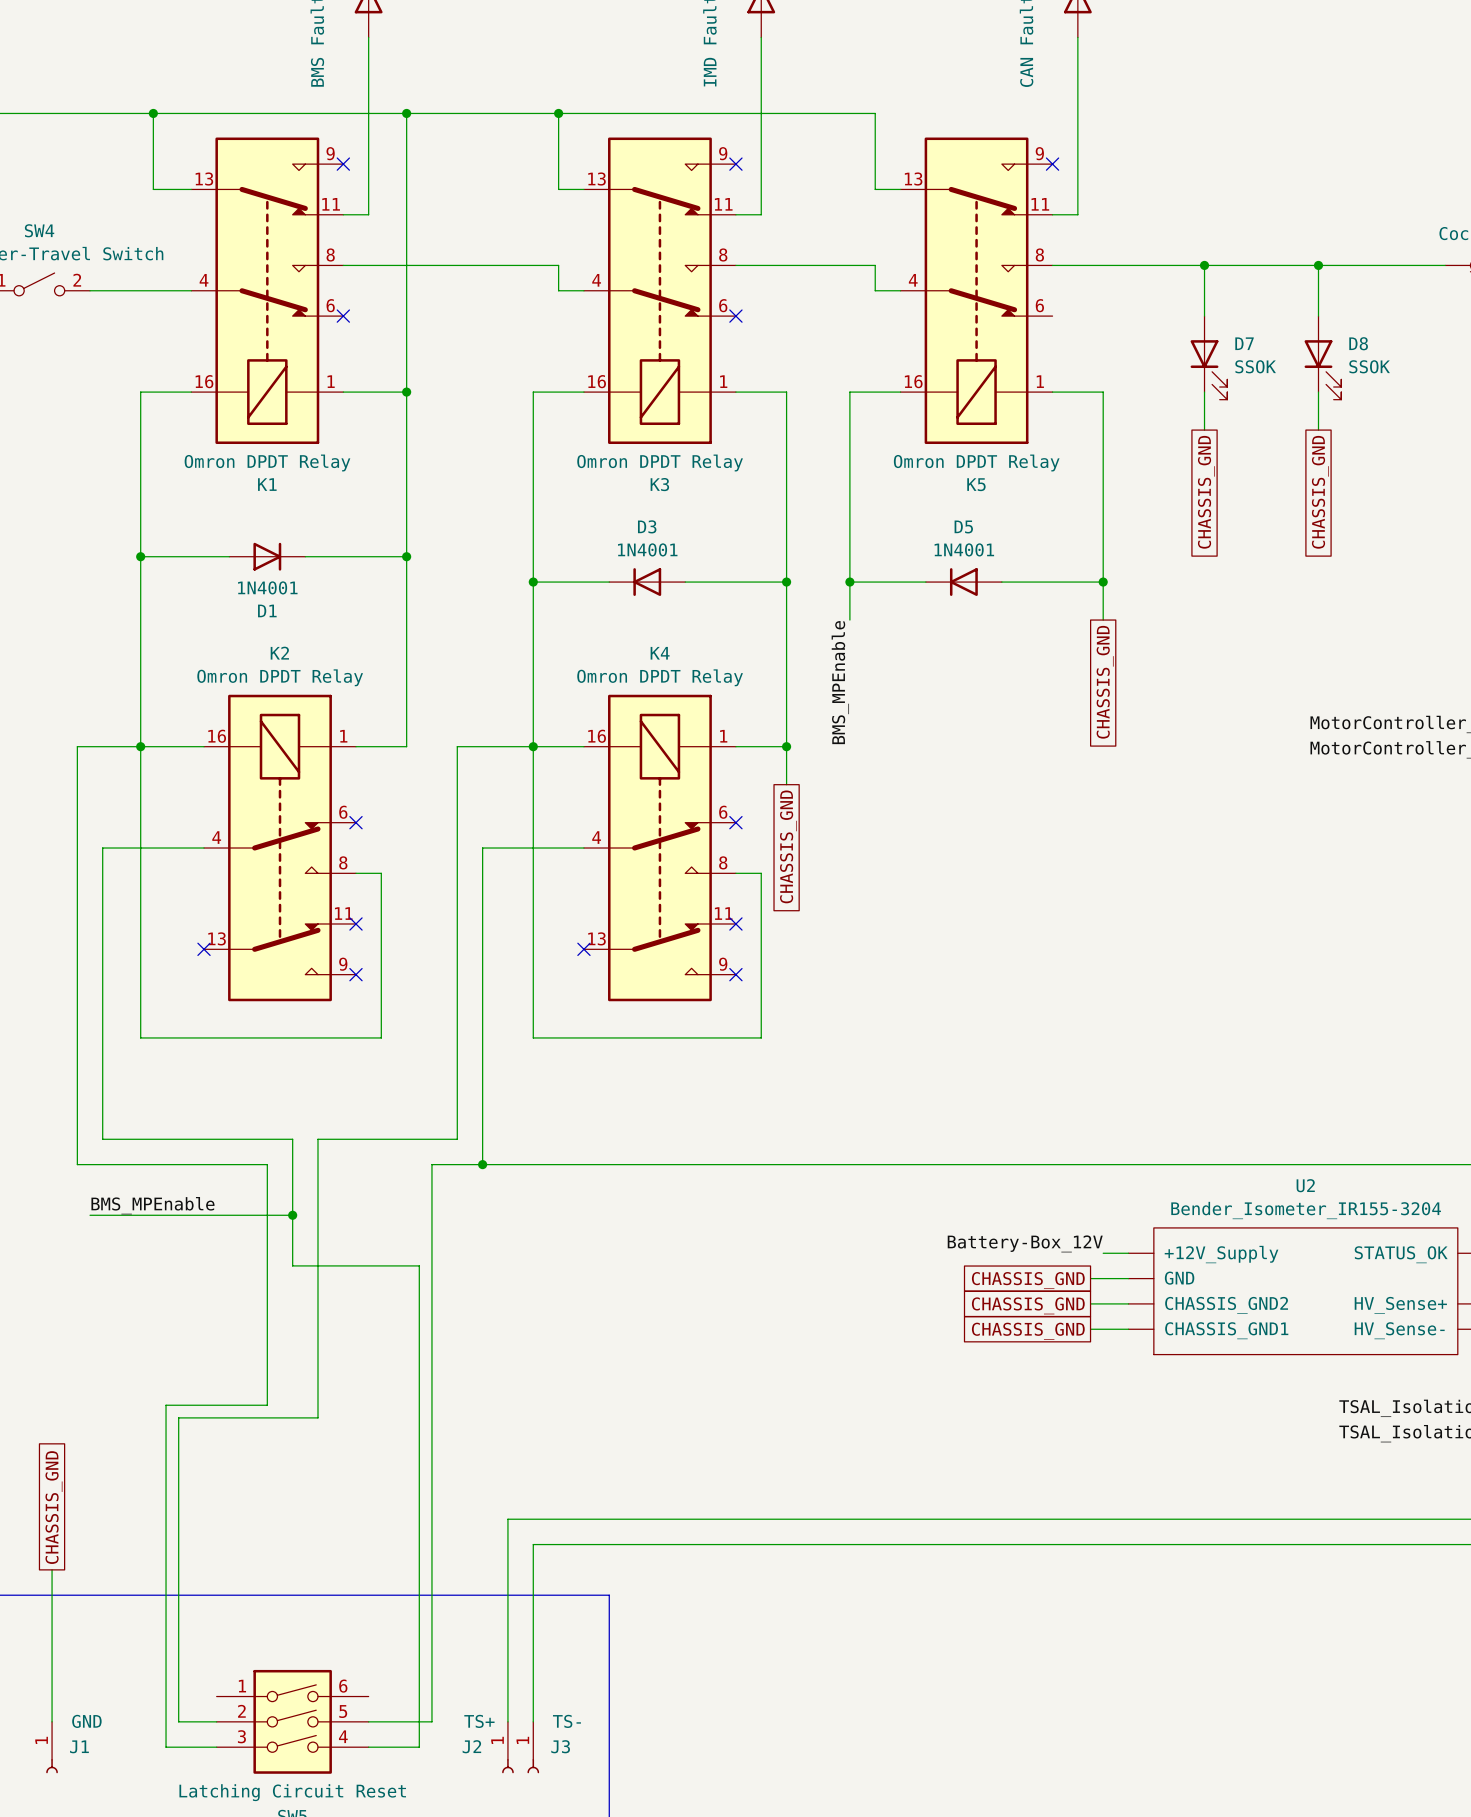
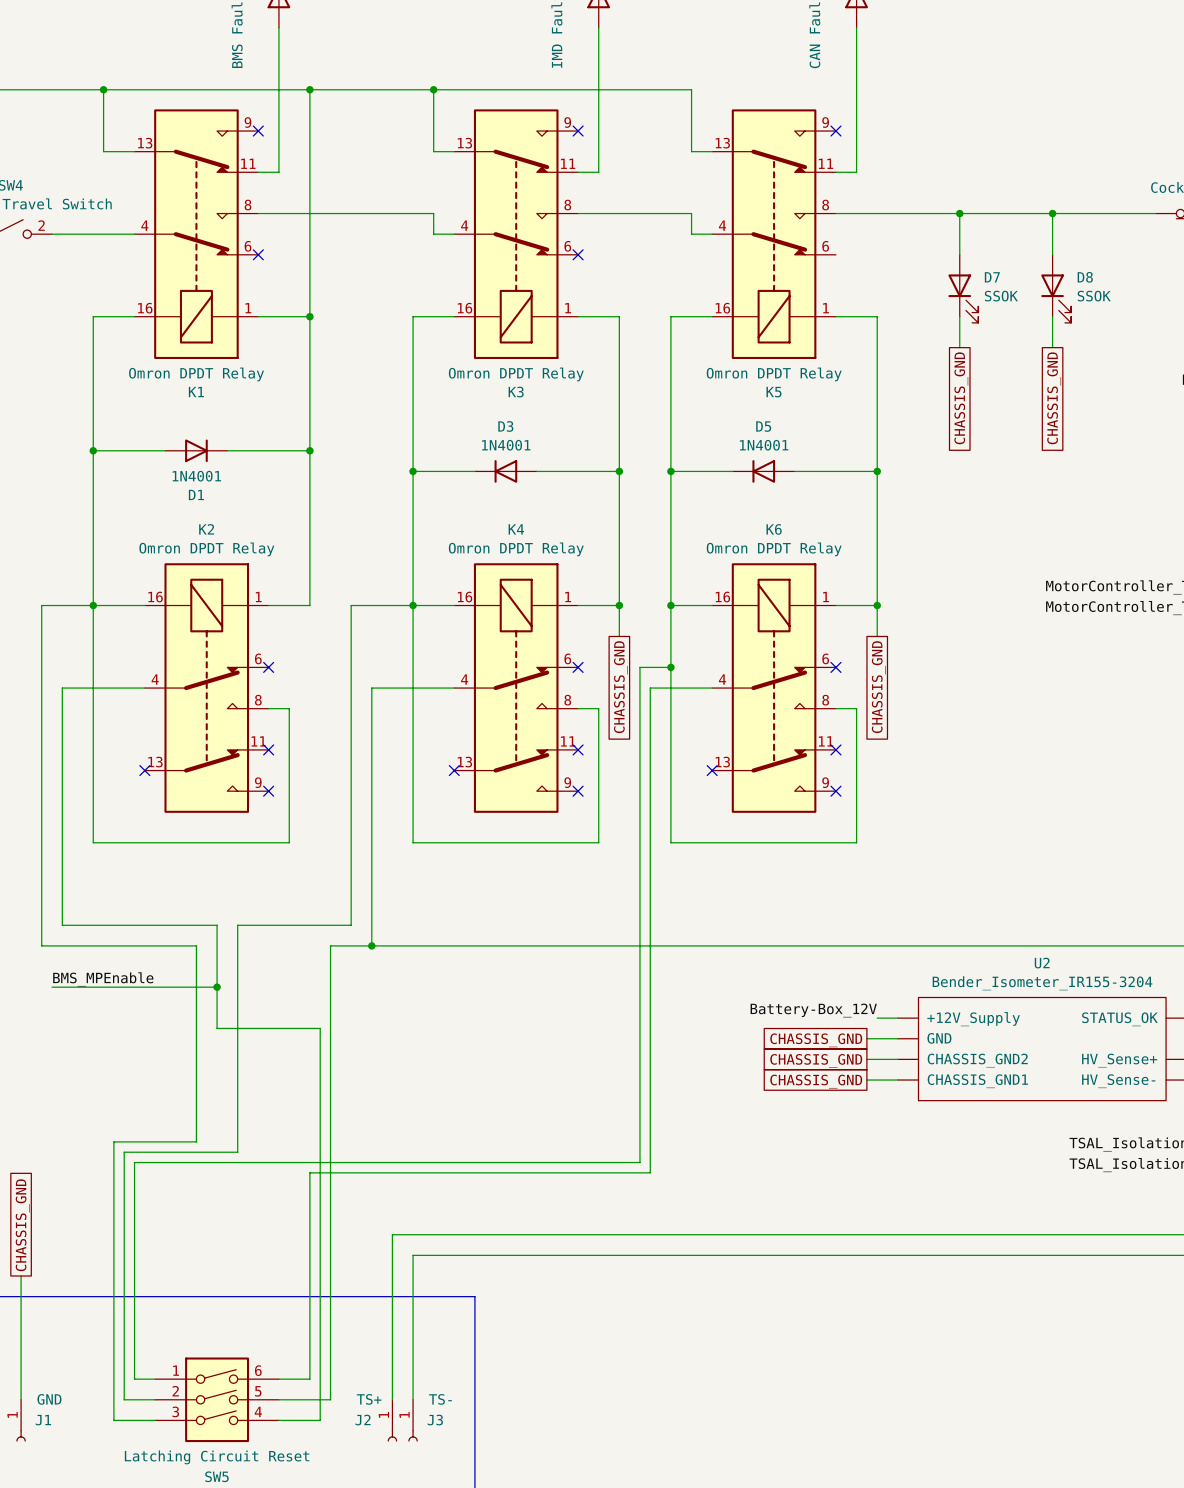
wire: none -> (670, 502) (670, 842) (856, 842) (856, 708) (835, 708)
wire: none -> (877, 502) (877, 636)
label: BMS_MPEnable (840, 682) -> none
global label position: CHASSIS_GND (1105, 682) -> CHASSIS_GND (878, 687)
wire: none -> (670, 605) (712, 605)
junction: none -> (670, 605)
wire: none -> (835, 605) (877, 605)
junction: none -> (877, 605)
wire: none -> (670, 667) (639, 667) (639, 1162) (134, 1162) (134, 1379) (155, 1379)
junction: none -> (670, 667)
no-connect mark: none -> (835, 667)
wire: none -> (712, 688) (650, 688) (650, 1172) (309, 1172) (309, 1379) (278, 1379)
K6: none -> Omron DPDT Relay (774, 688)
no-connect mark: none -> (835, 749)
no-connect mark: none -> (712, 770)
no-connect mark: none -> (835, 791)

